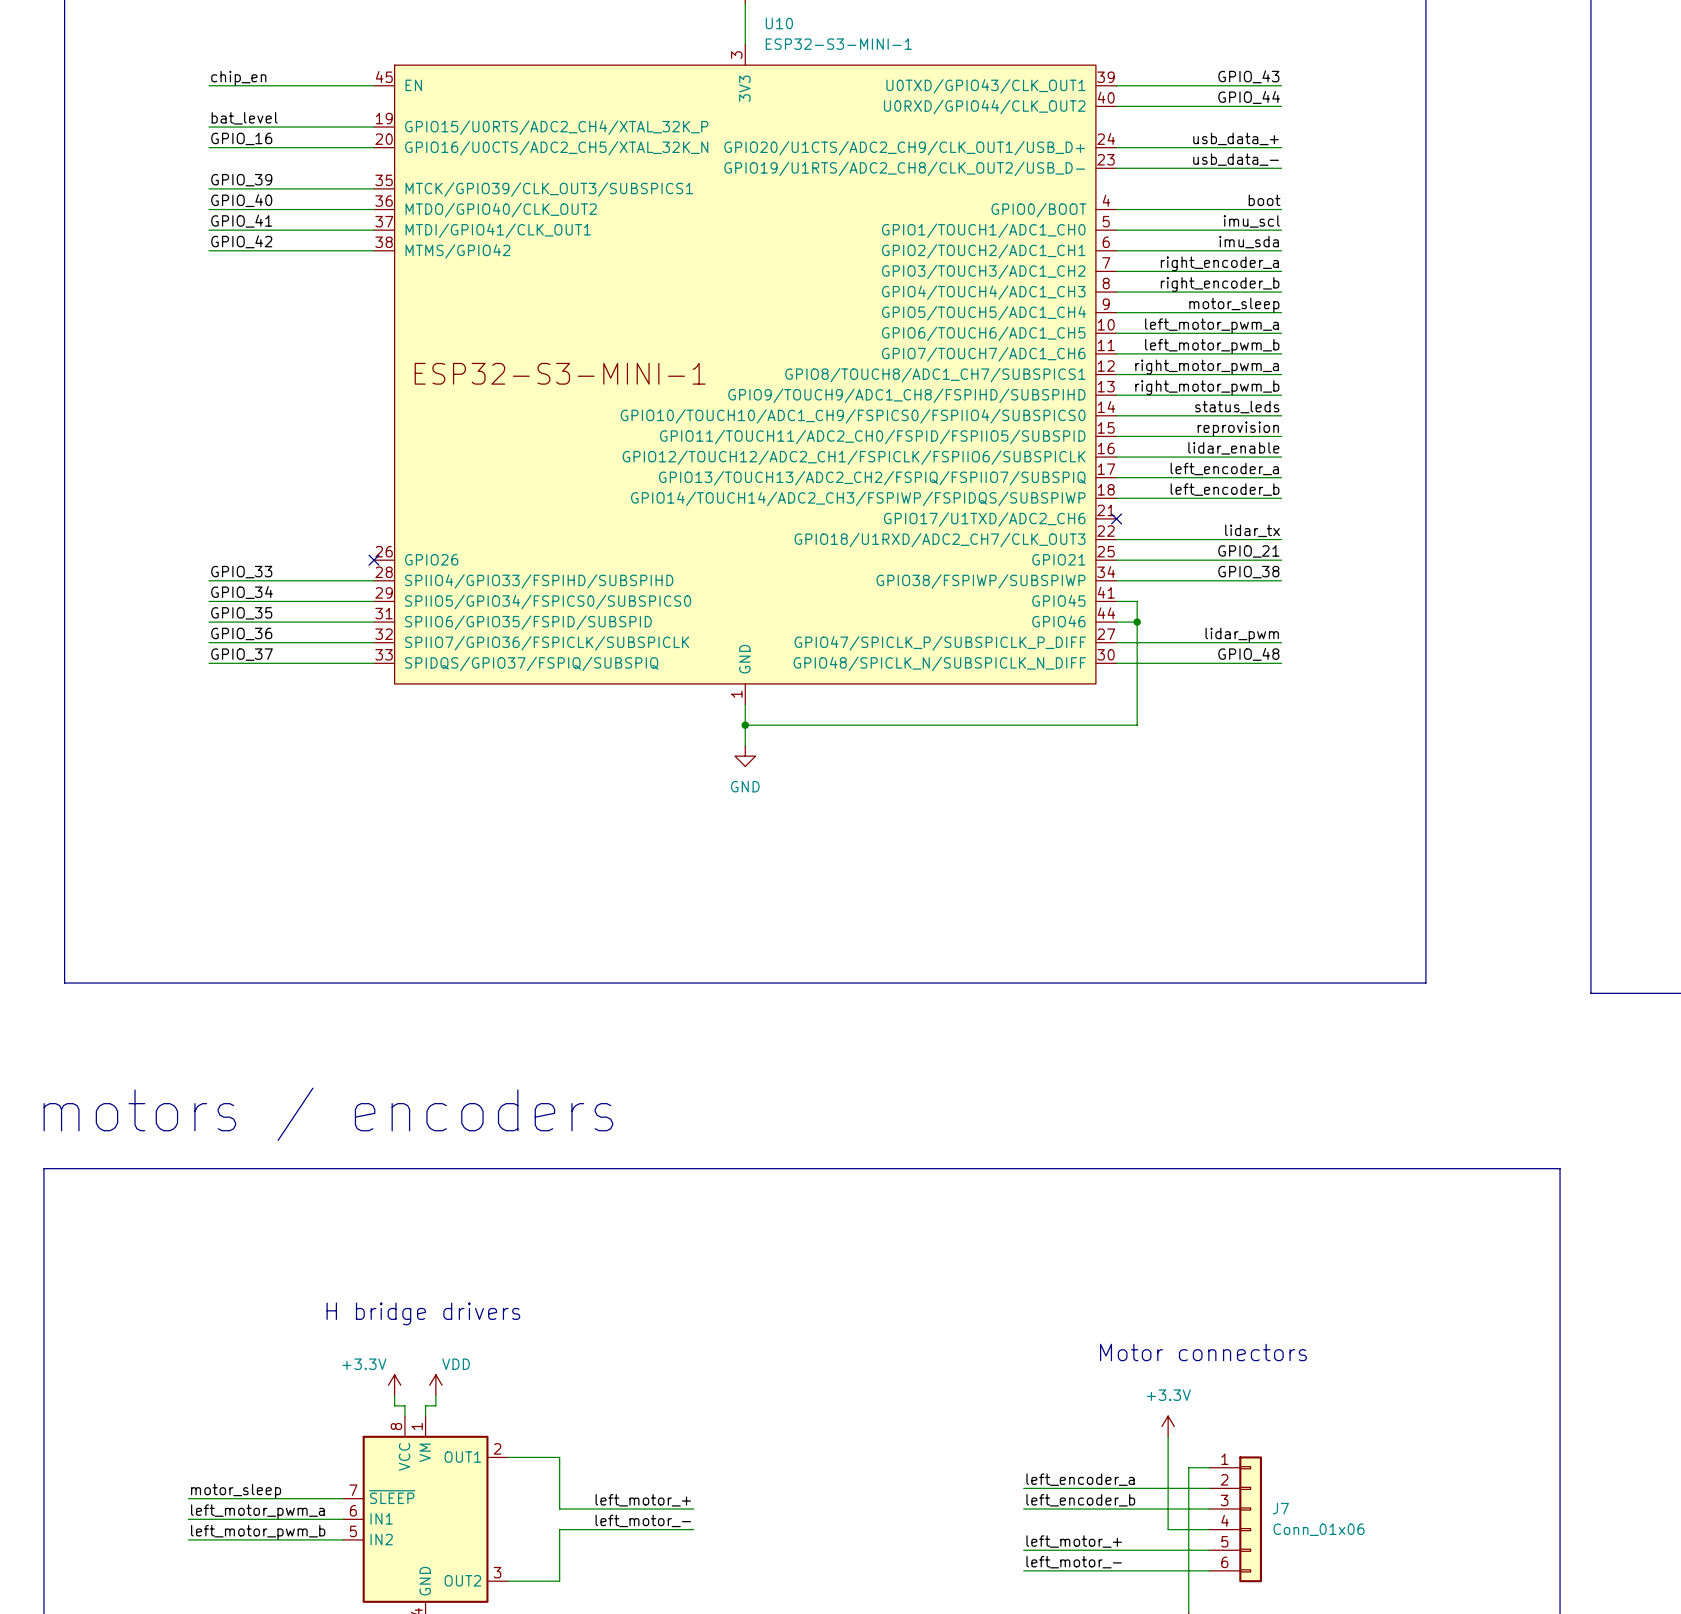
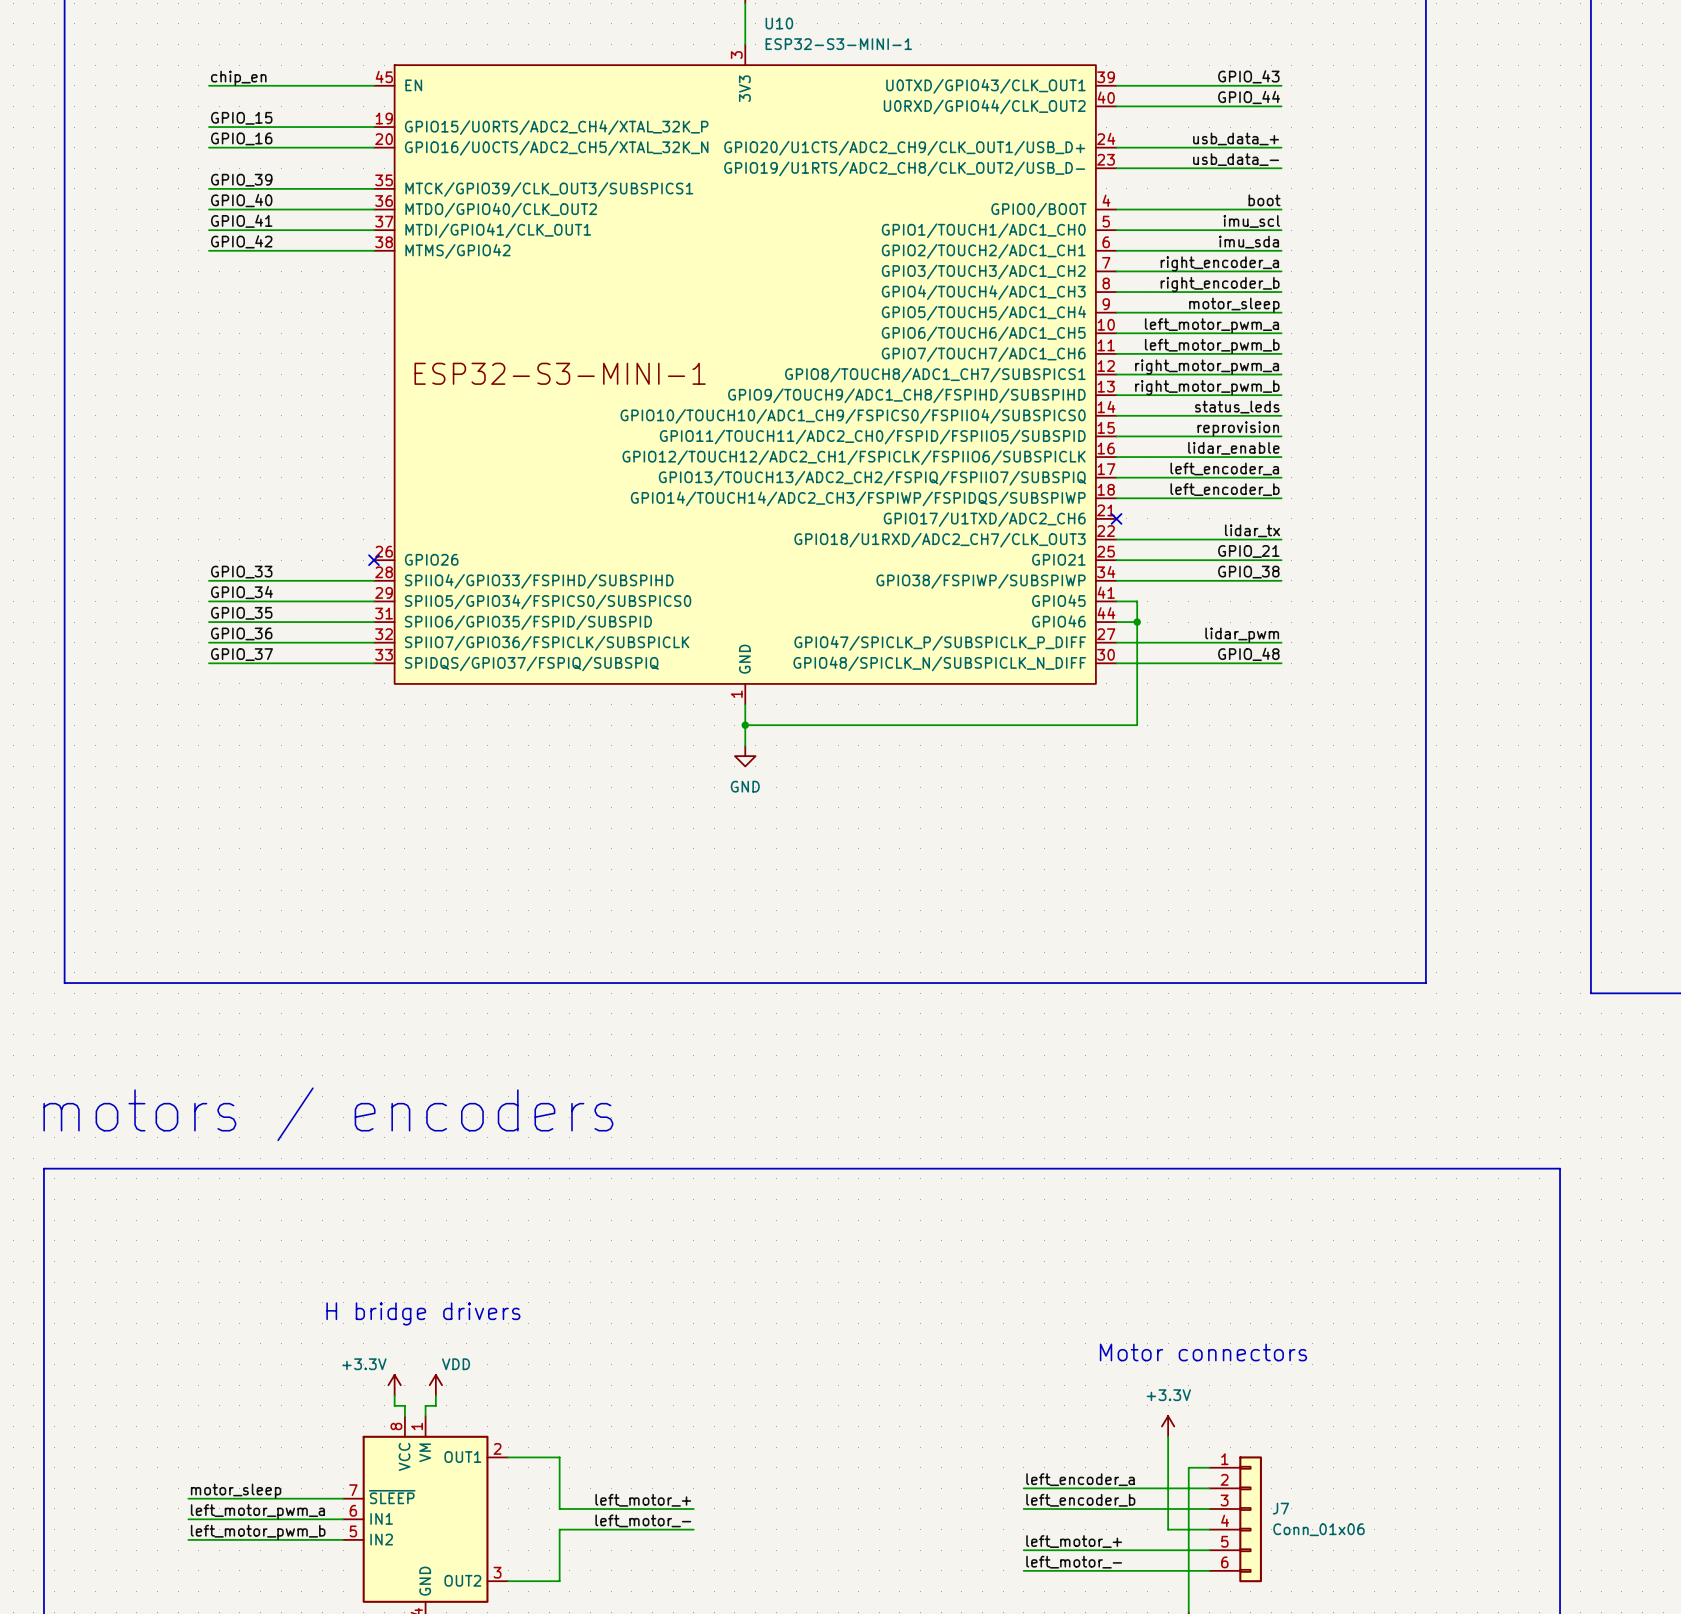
label: bat_level (244, 118) -> GPIO_15 (241, 118)

